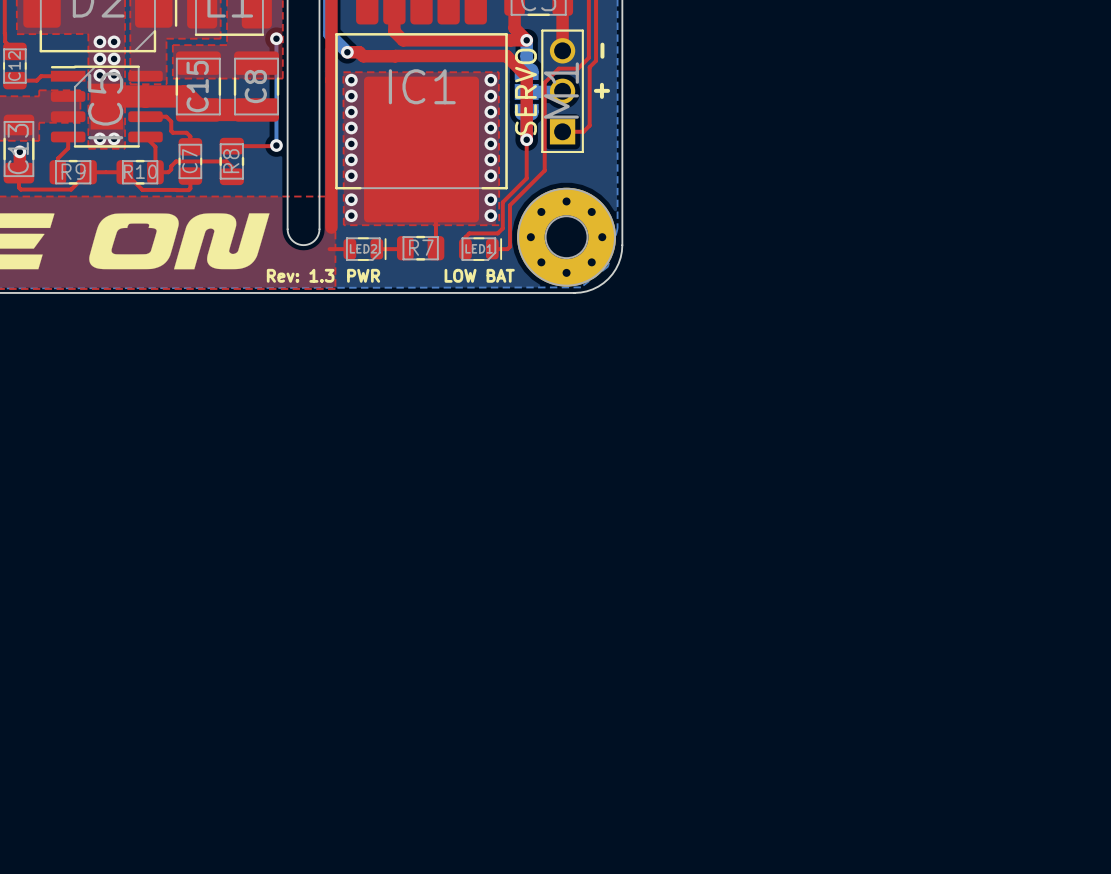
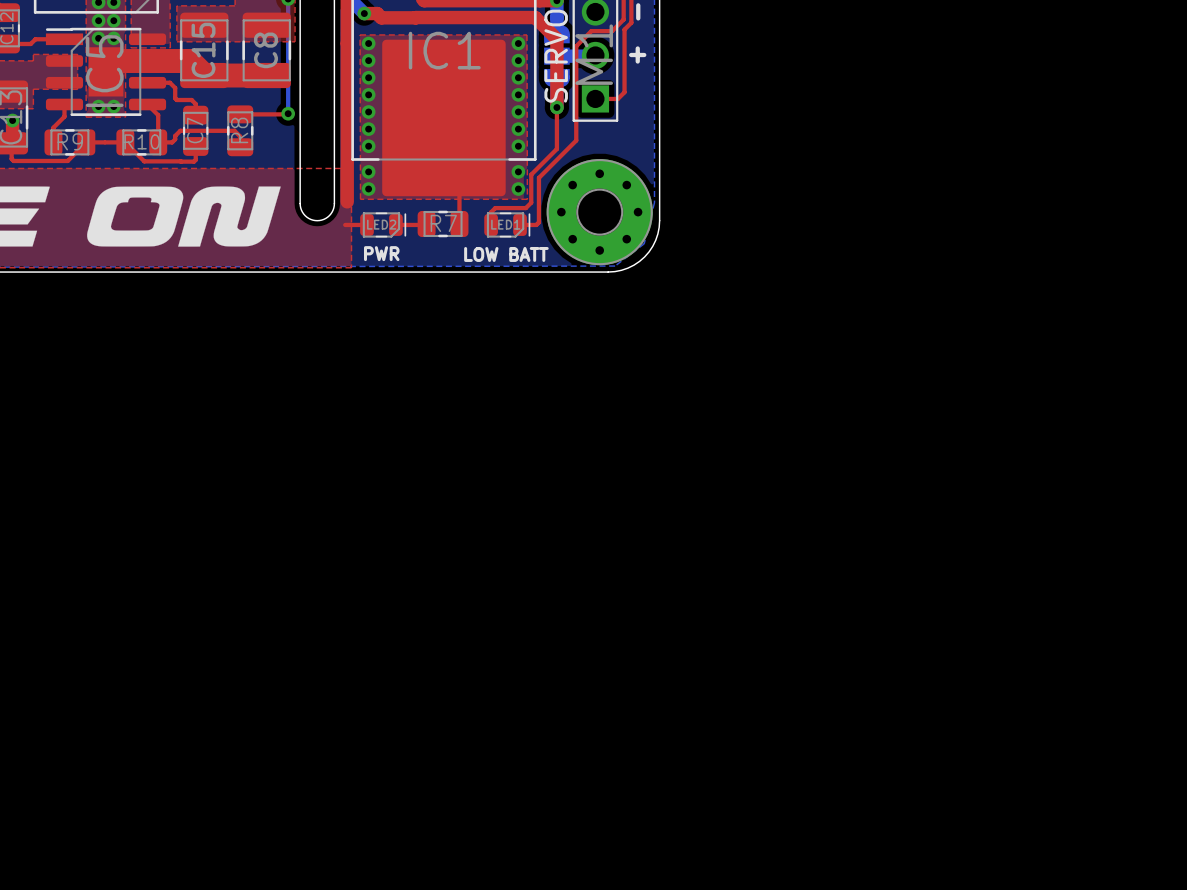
text: Rev: 1.3 (300, 275) -> none
text: LOW BAT (479, 275) -> LOW BATT (506, 254)

